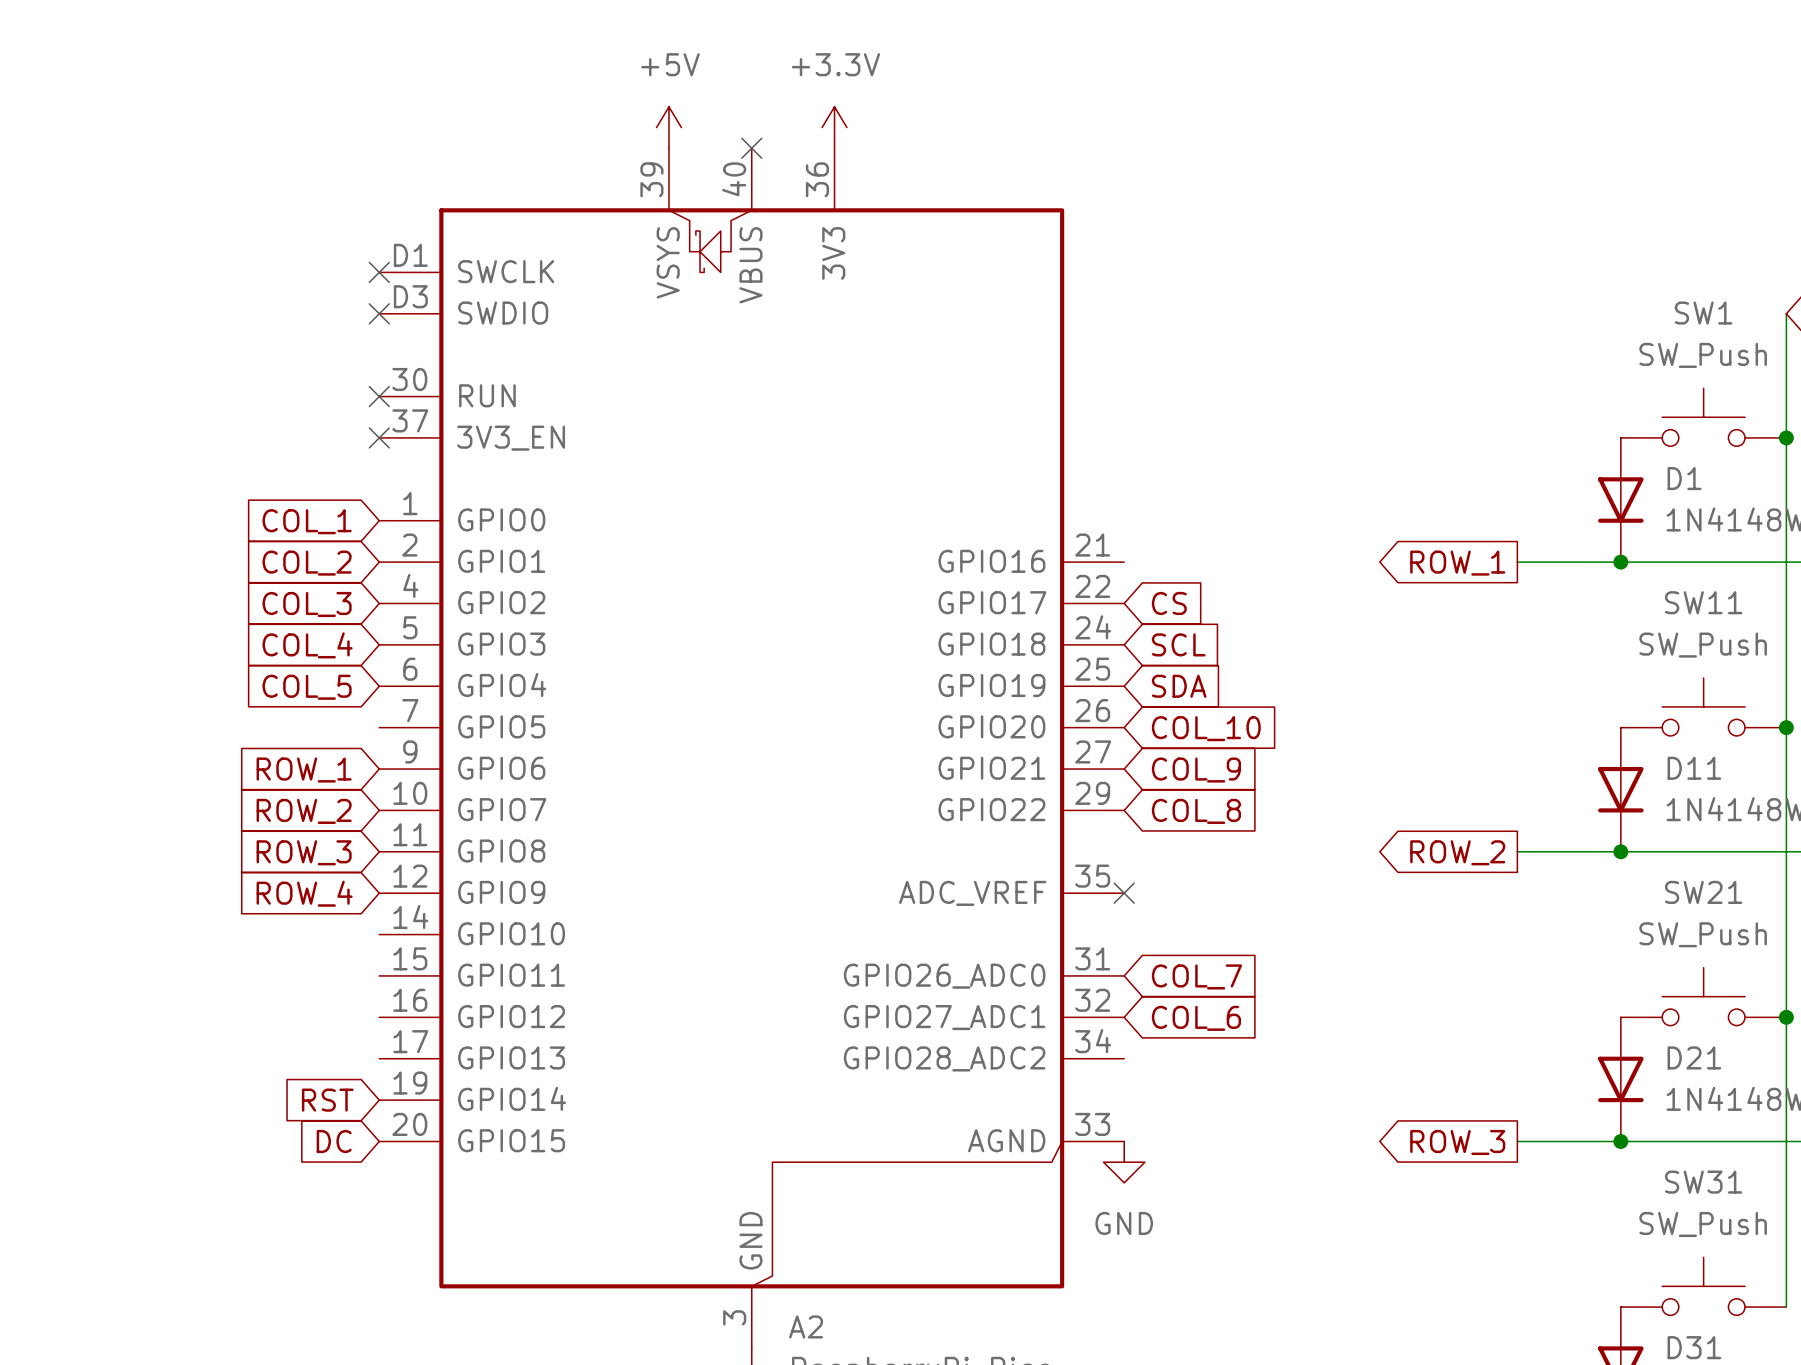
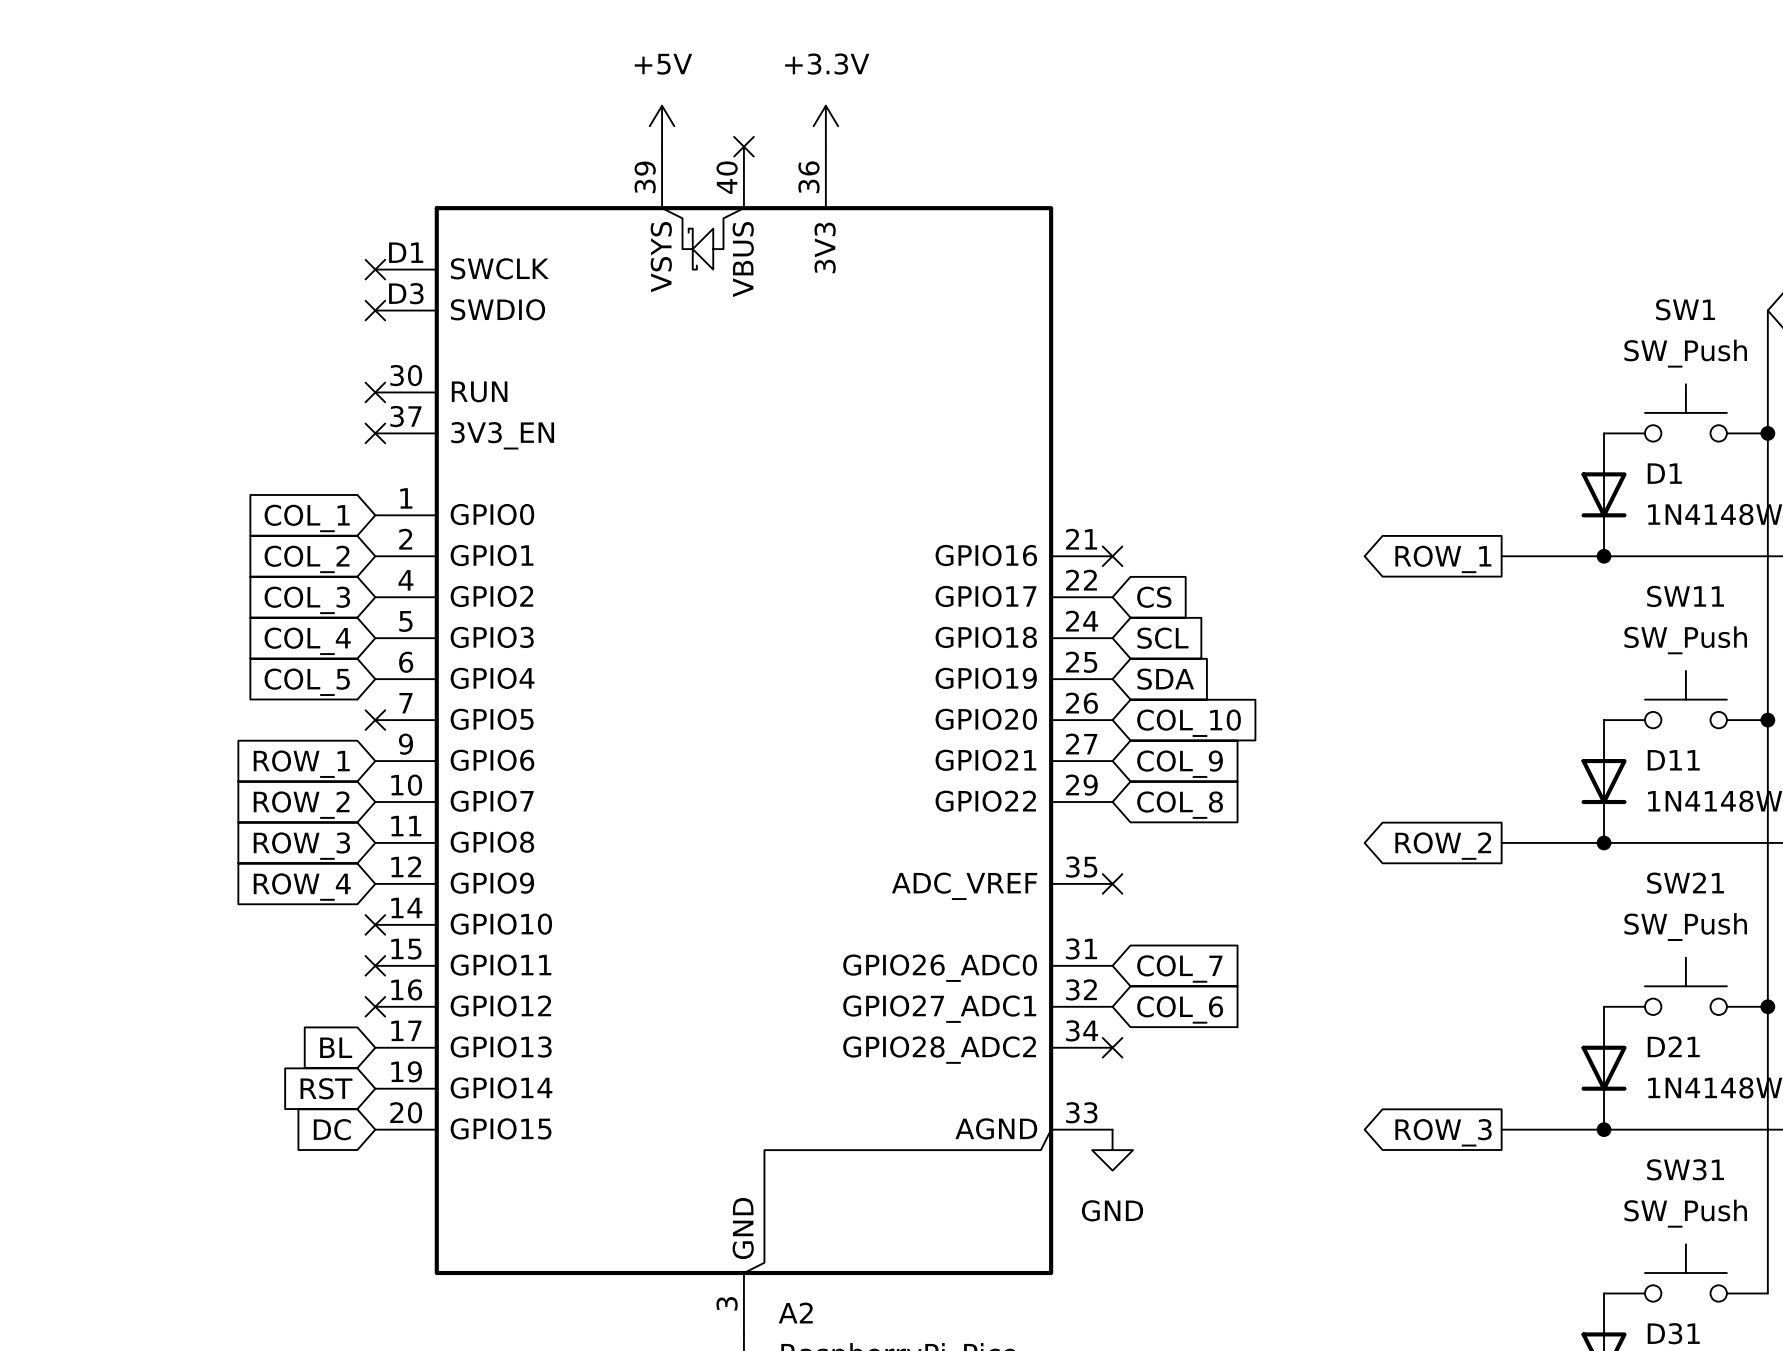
no-connect mark: none -> (1112, 556)
no-connect mark: none -> (375, 720)
no-connect mark: none -> (375, 924)
no-connect mark: none -> (375, 965)
no-connect mark: none -> (375, 1006)
global label: none -> BL (336, 1047)
no-connect mark: none -> (1112, 1047)

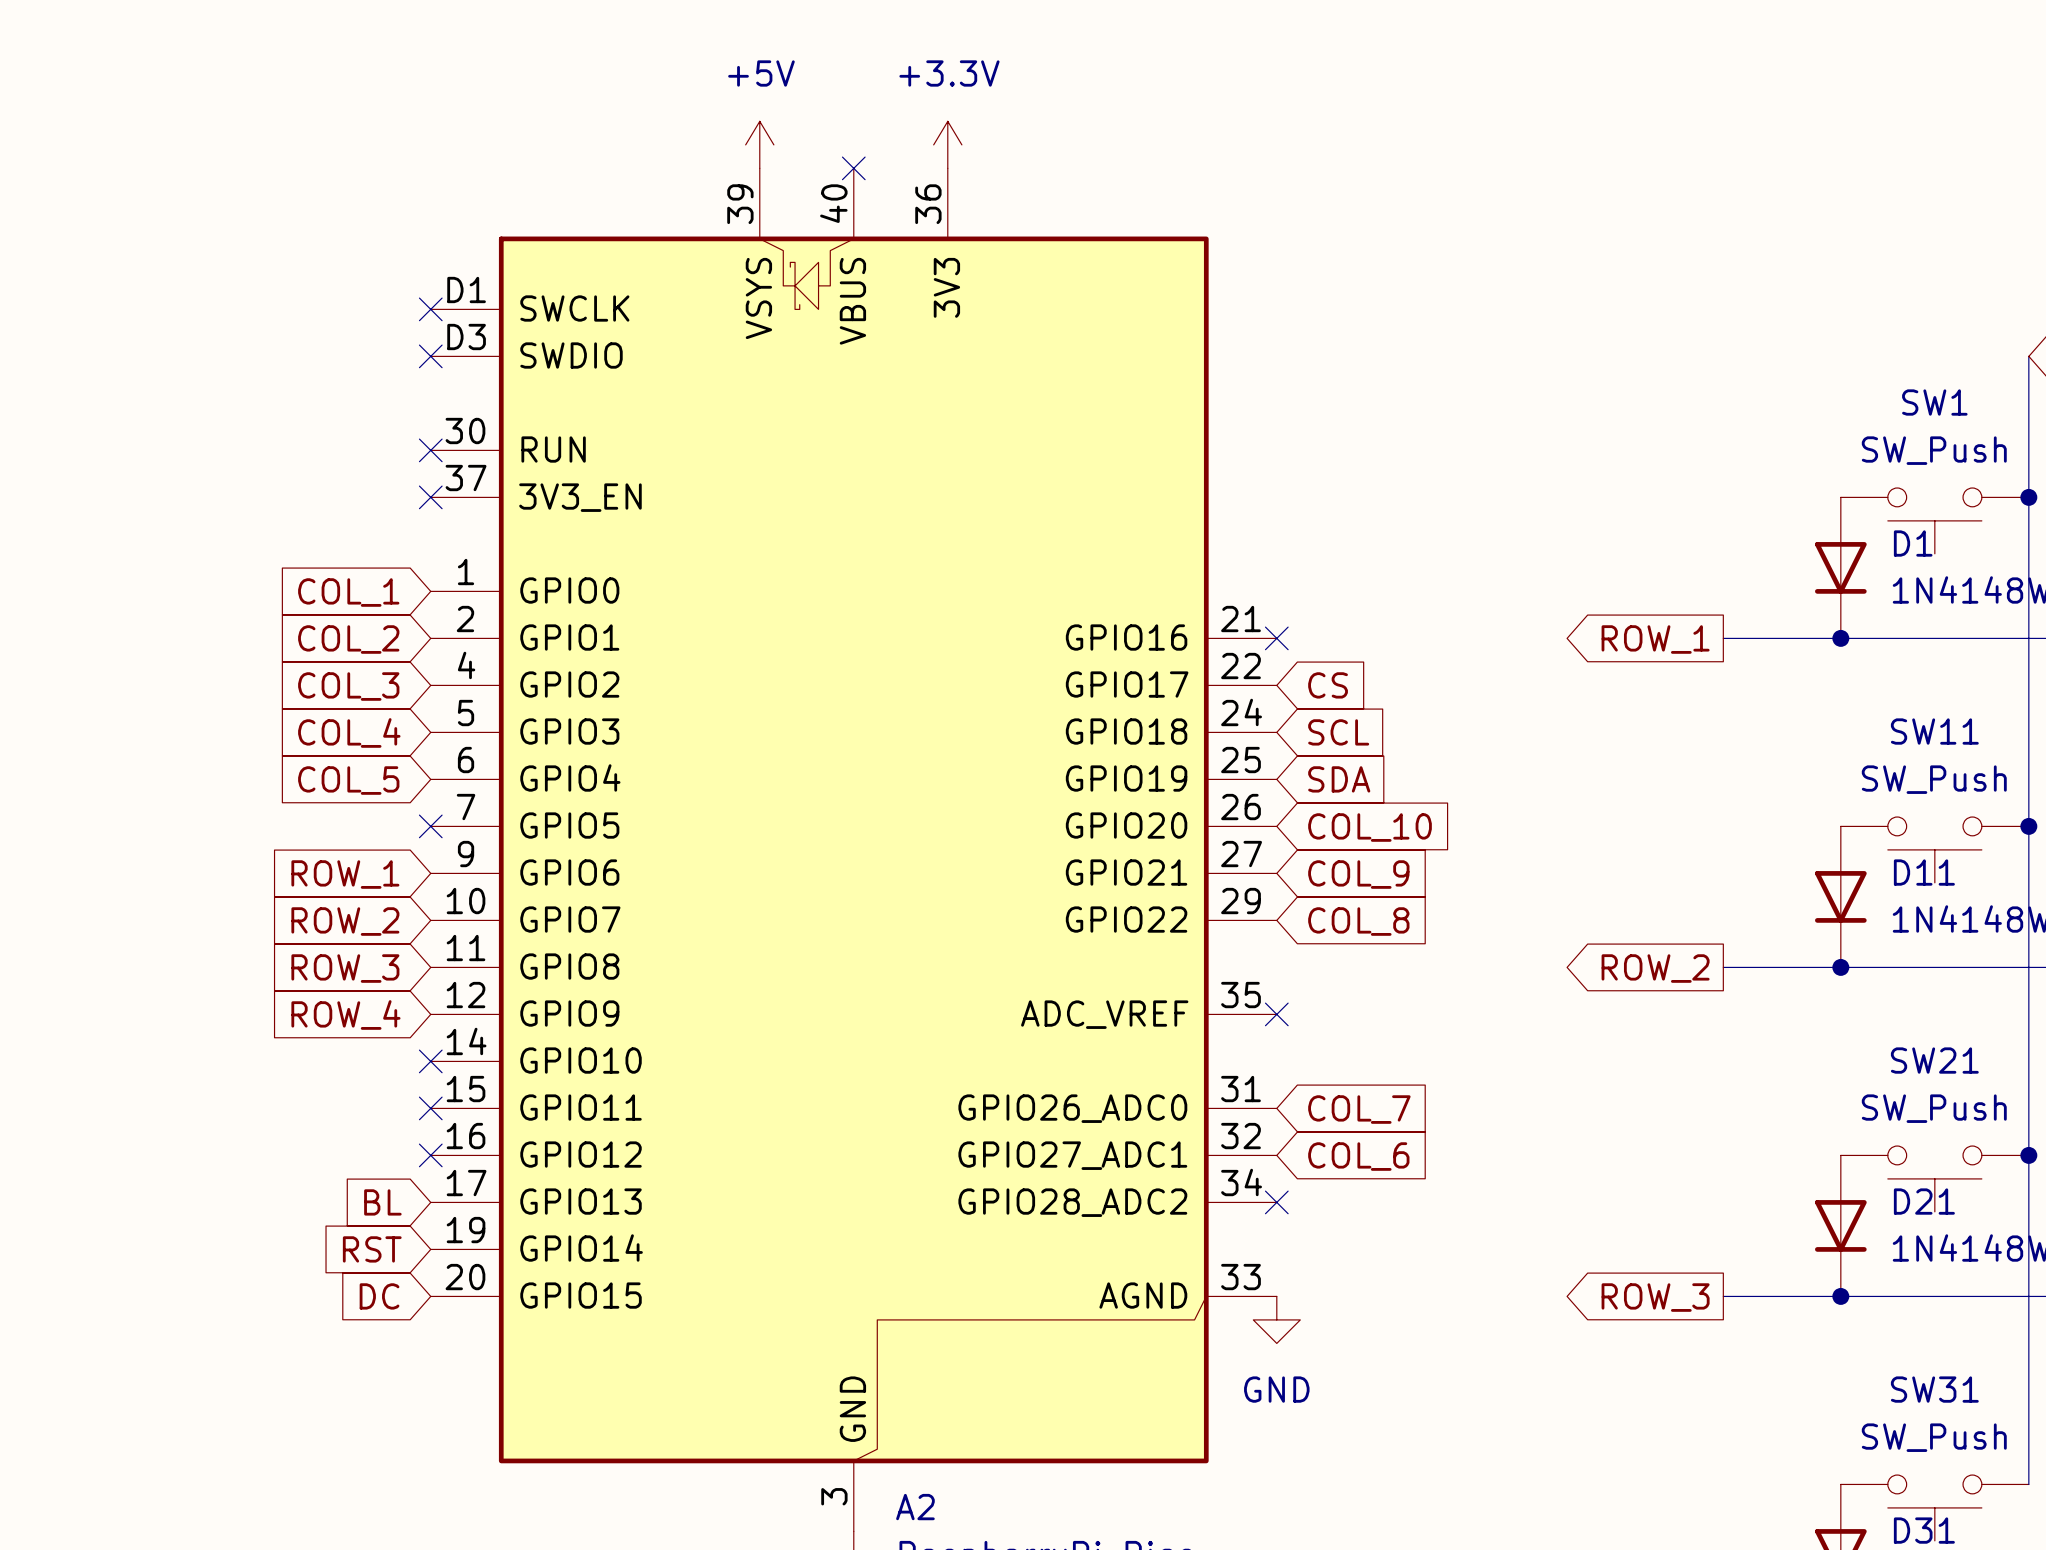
SW1 rotation: 0° (1685, 412) -> 180° (1934, 520)
SW11 rotation: 0° (1685, 699) -> 180° (1934, 849)
SW21 rotation: 0° (1685, 986) -> 180° (1934, 1178)
SW31 rotation: 0° (1685, 1273) -> 180° (1934, 1507)

